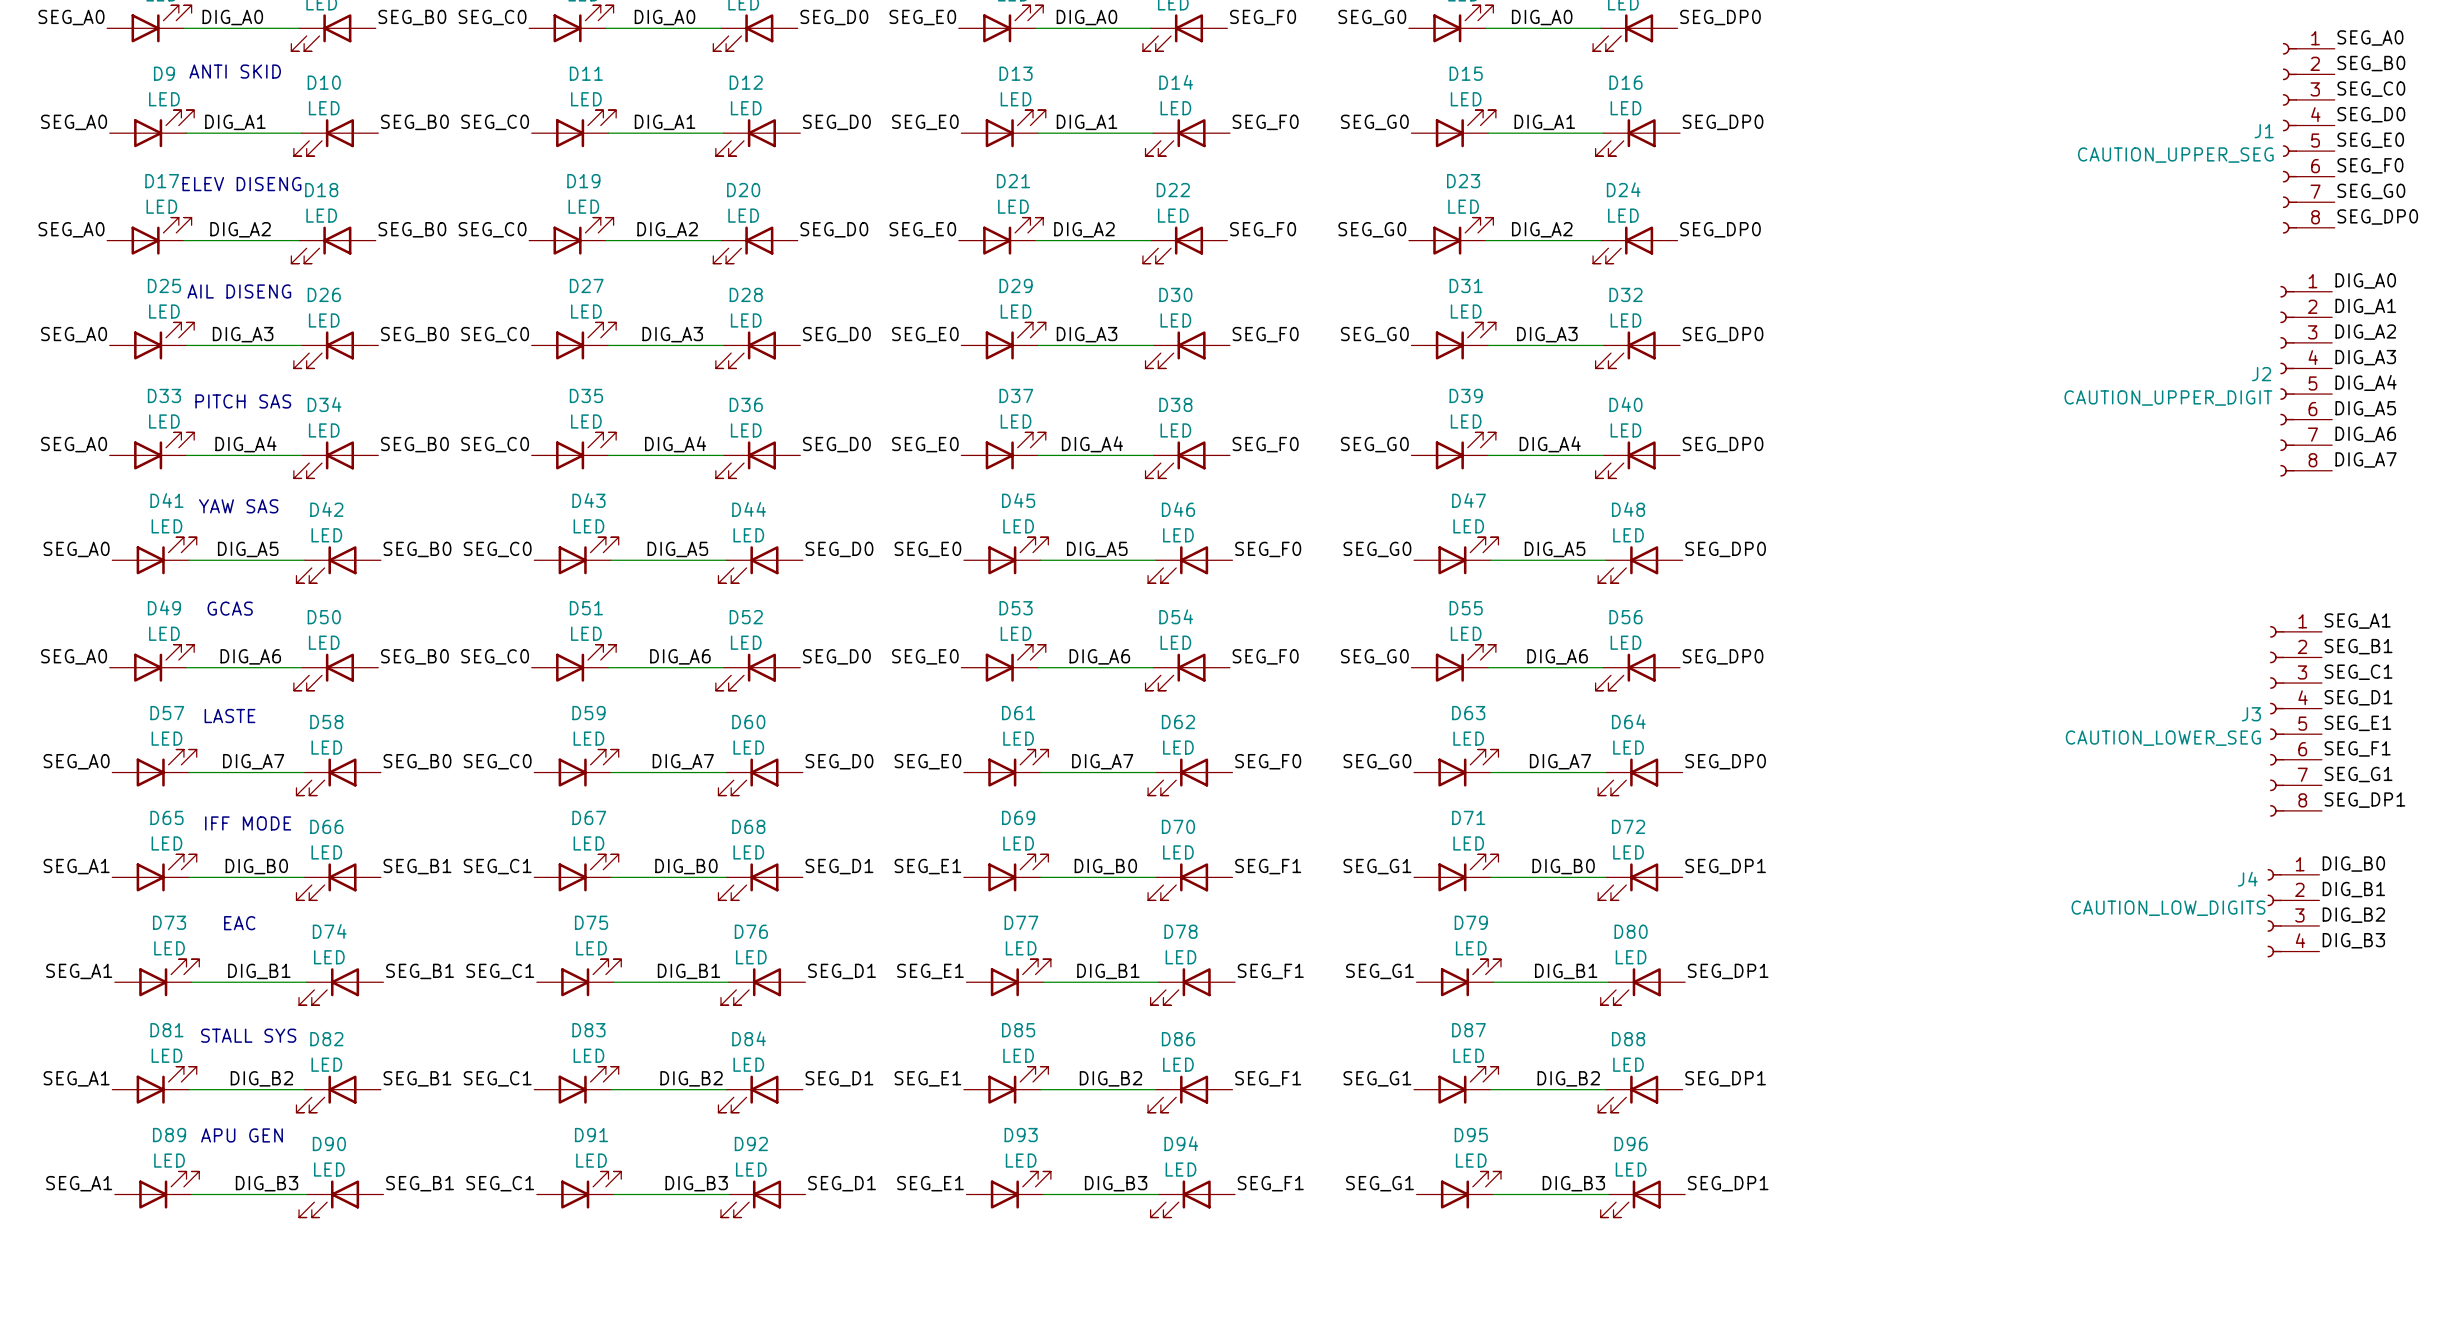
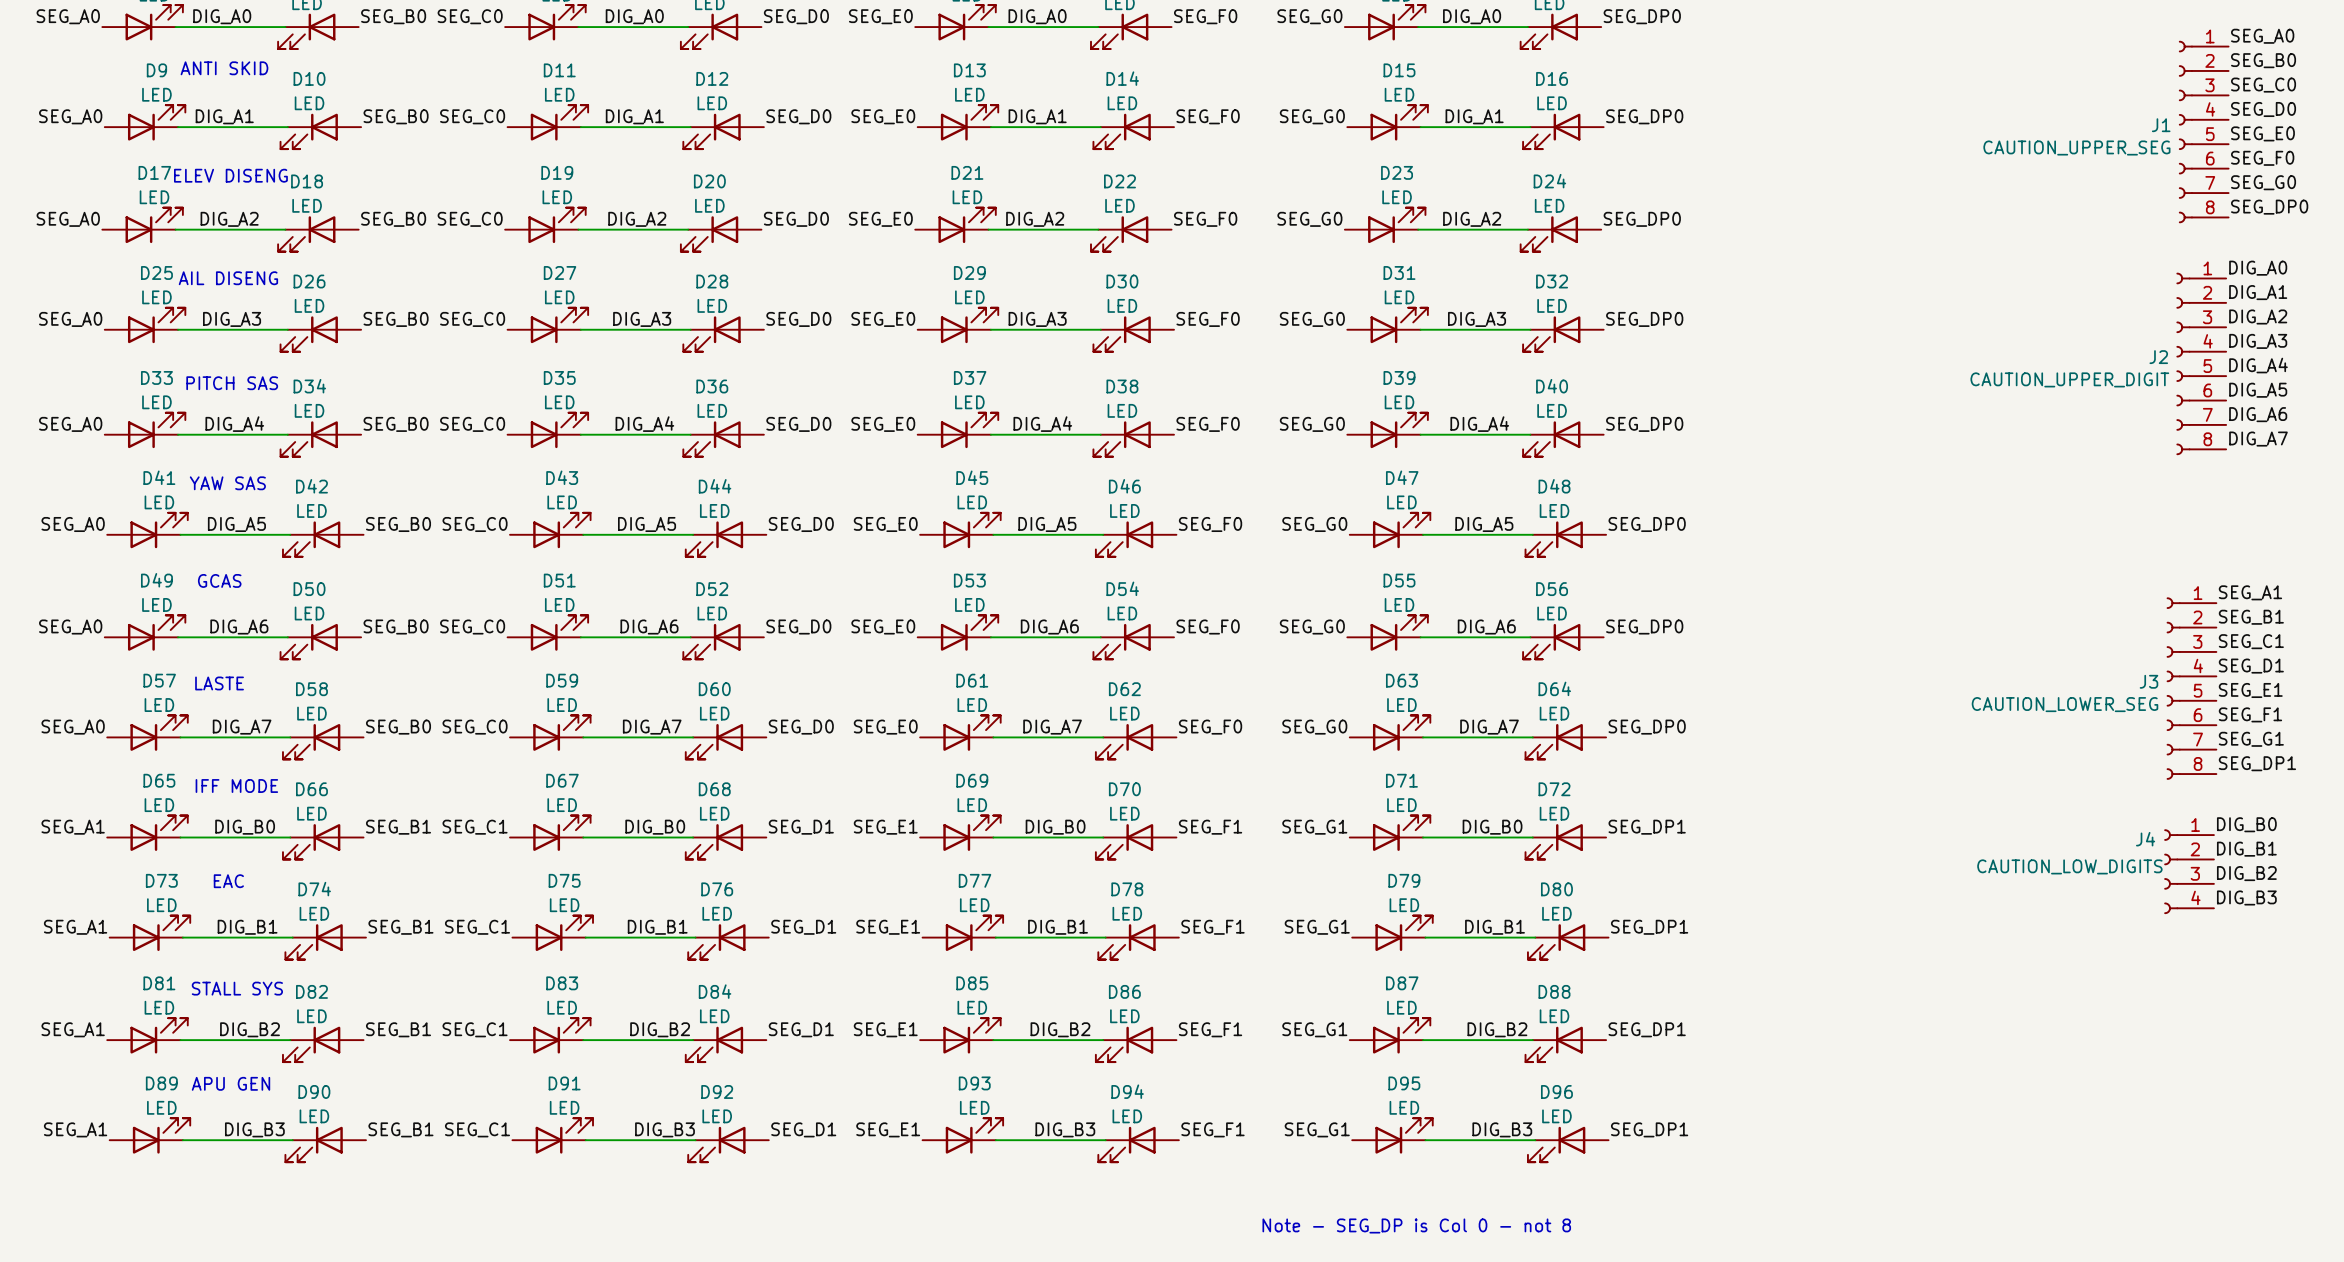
text: none -> Note - SEG_DP is Col 0 - not 8 (1416, 1225)

